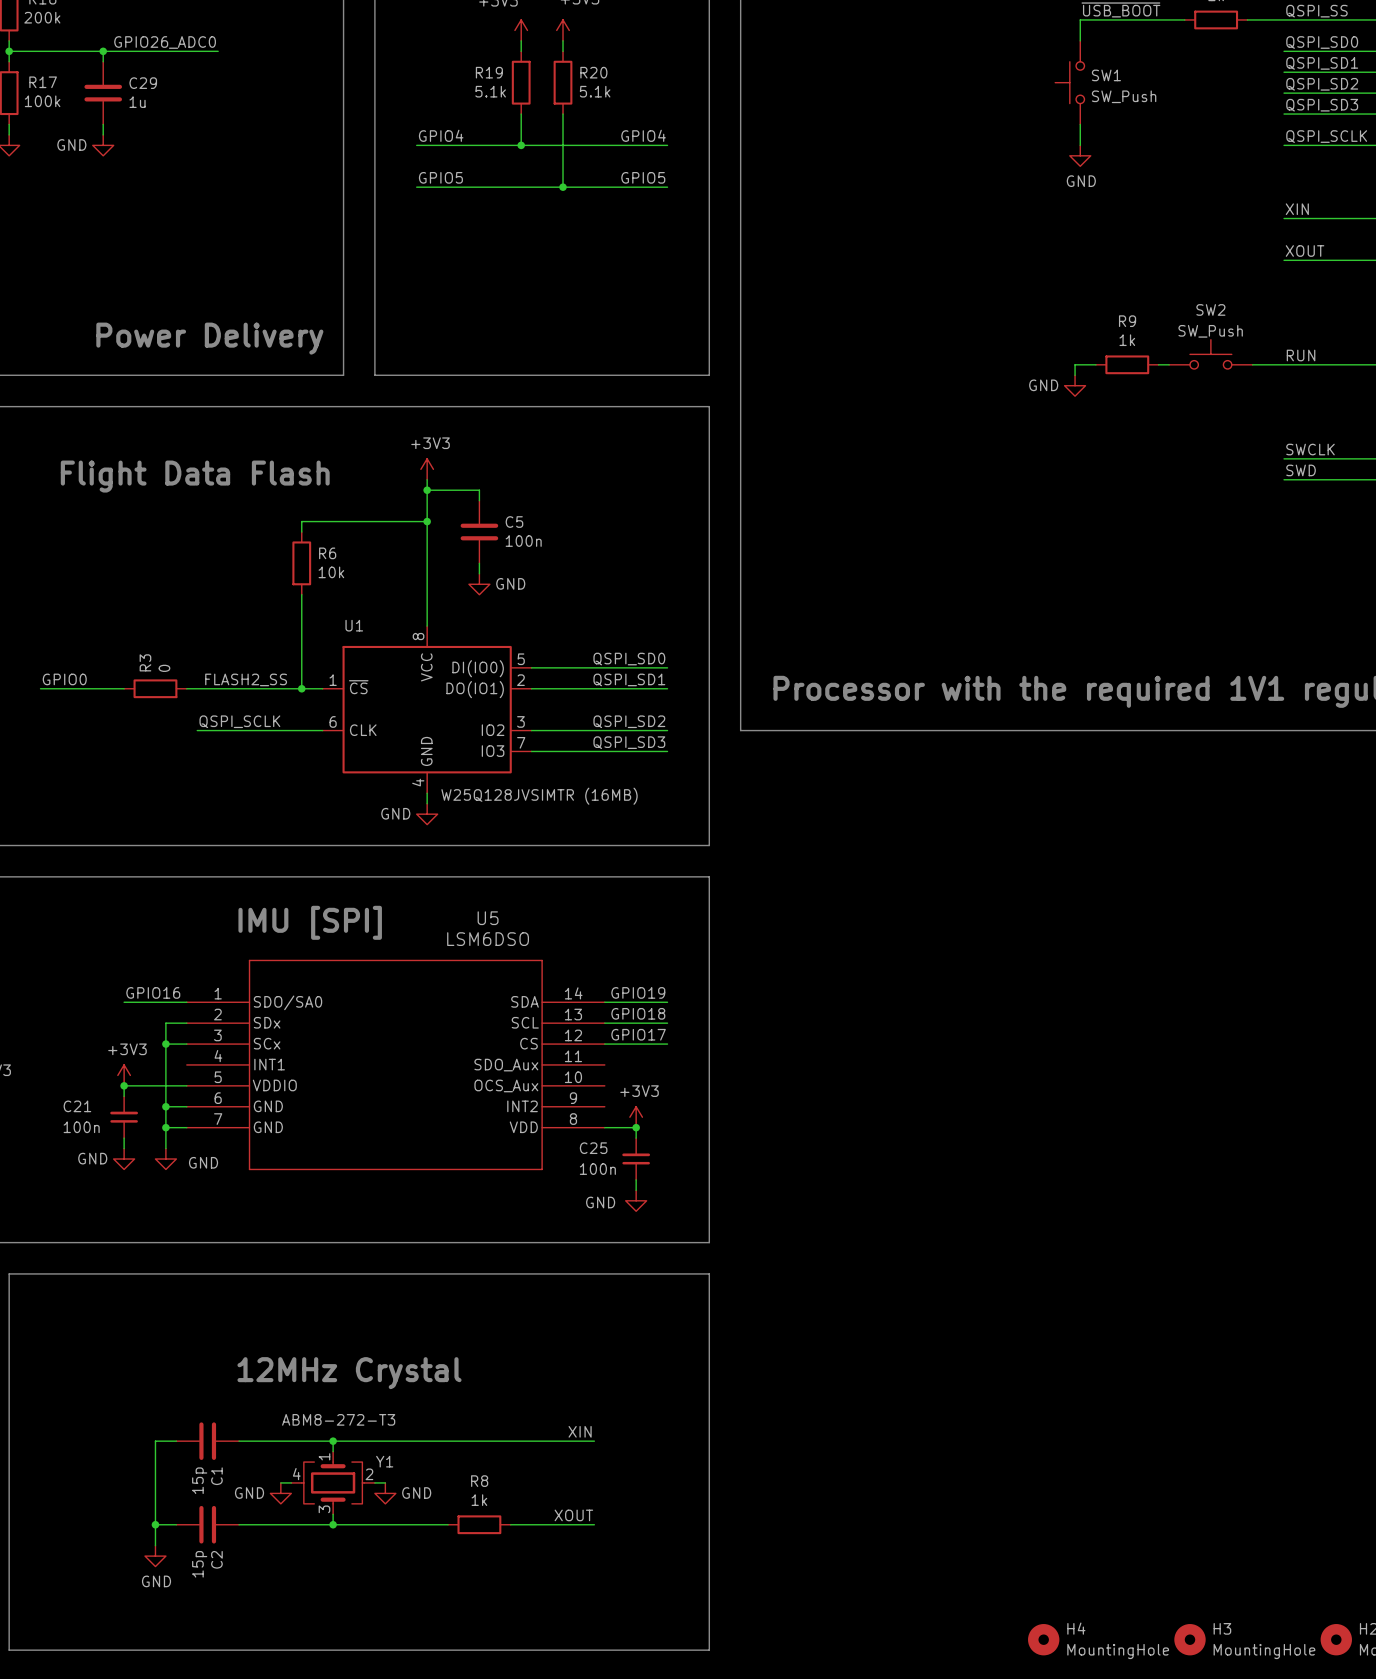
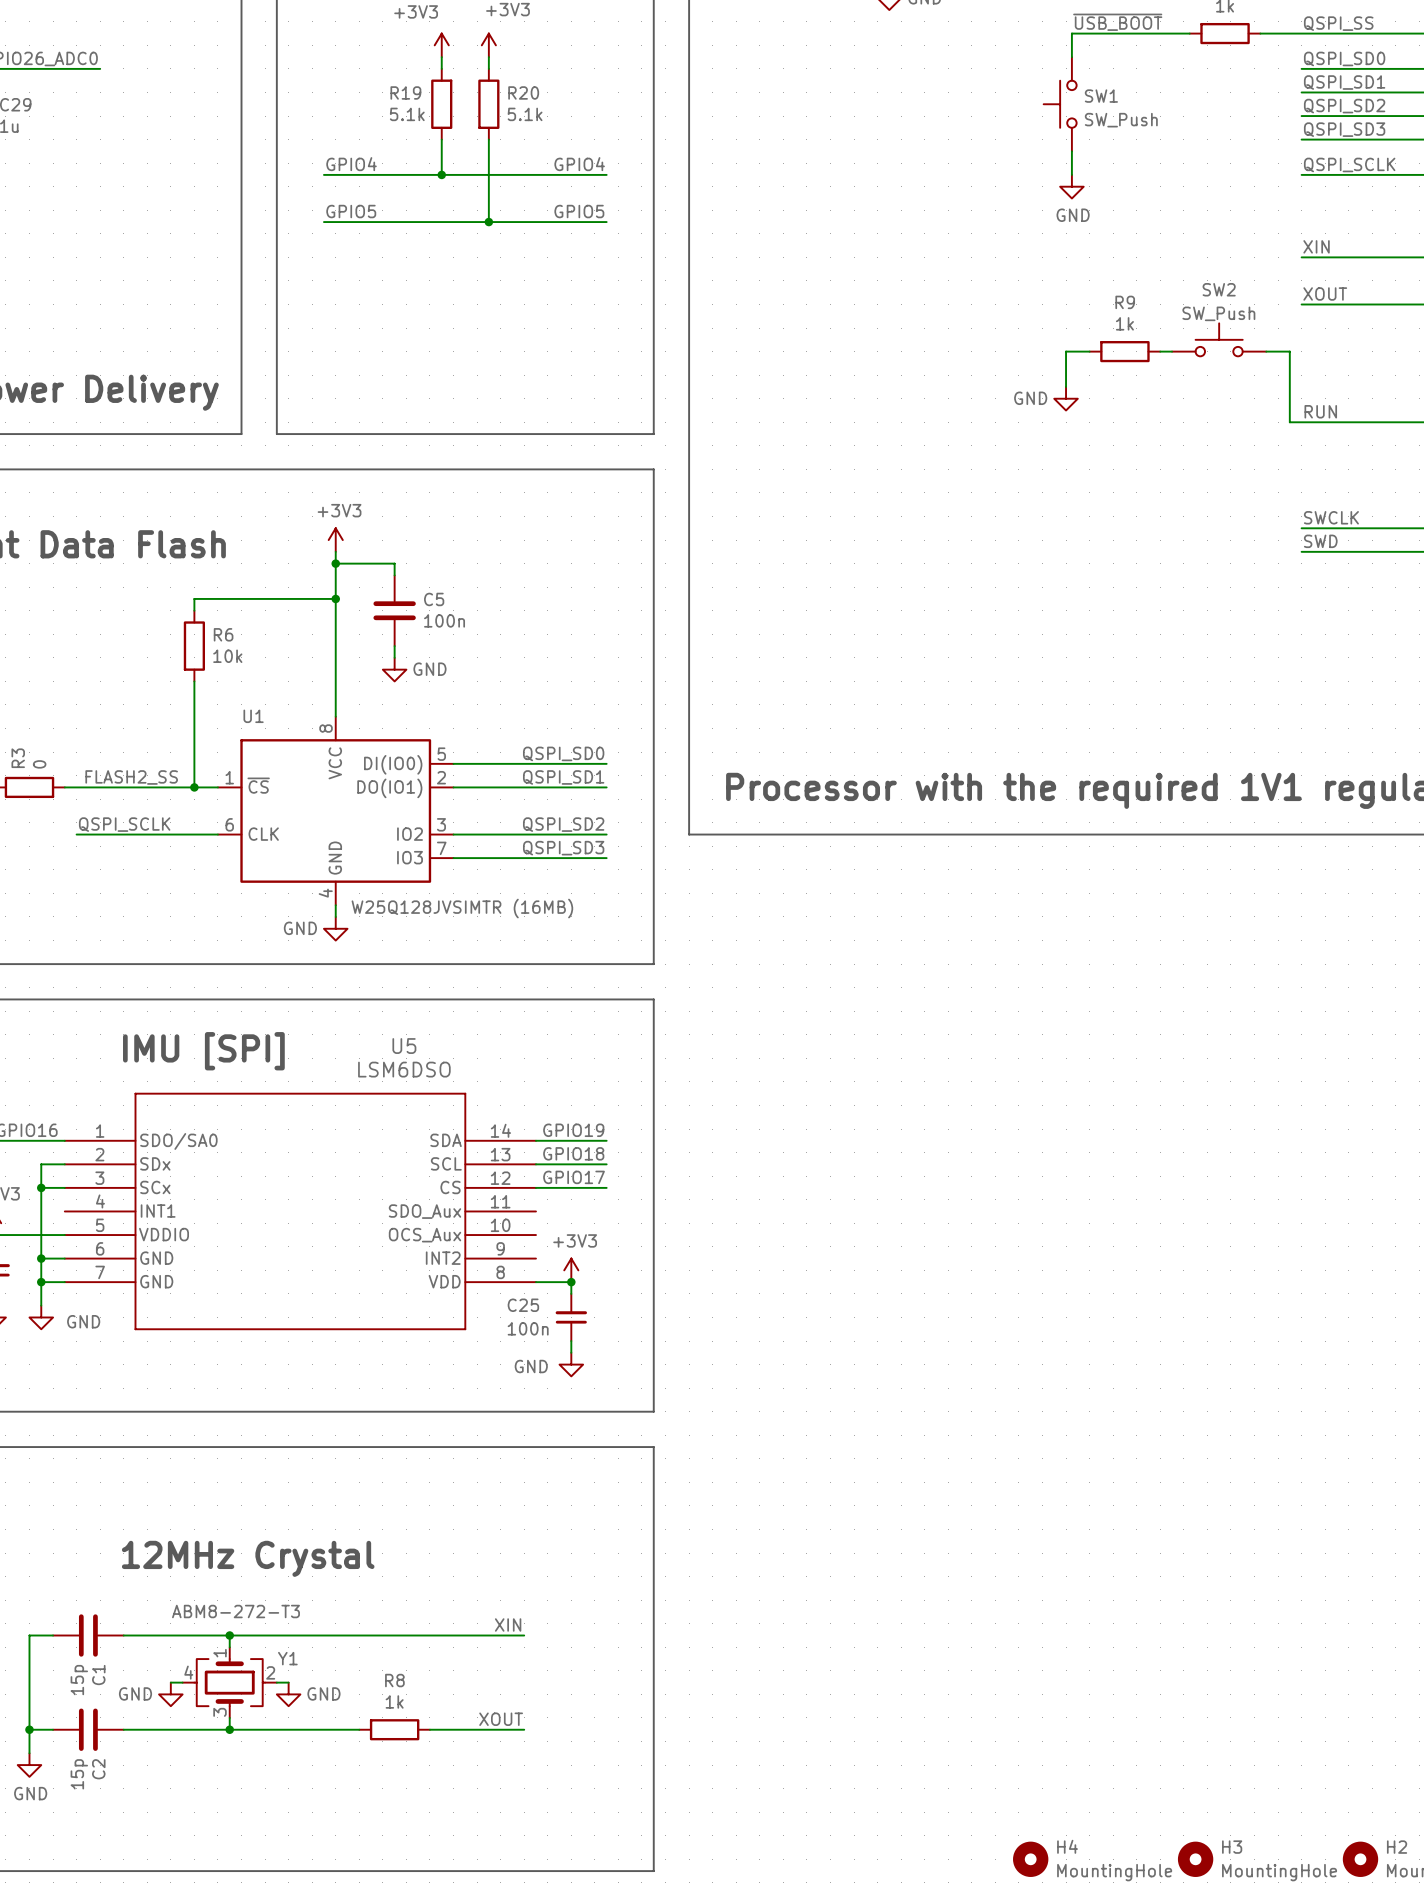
wire: none -> (1089, 351) (1066, 351) (1066, 386)
SW2 position: (1210, 354) -> (1219, 339)
wire: (1095, 364) (1075, 364) (1075, 375) -> none
R9 position: (1127, 364) -> (1124, 351)
wire: (1158, 364) (1169, 364) -> (1160, 351) (1172, 351)
wire: (1252, 364) (1273, 364) -> (1266, 351) (1289, 351) (1289, 422)
power symbol position: GND (1075, 385) -> GND (1066, 398)

